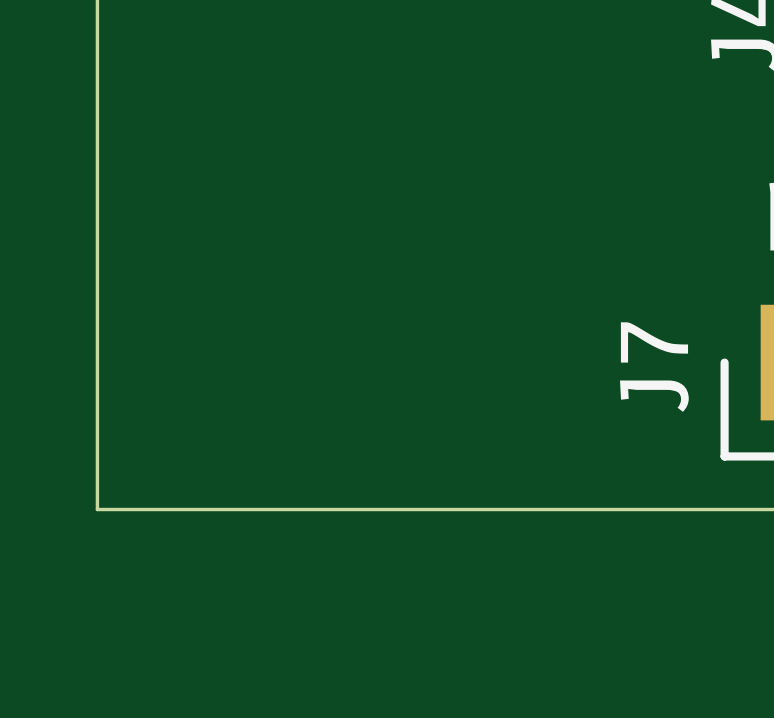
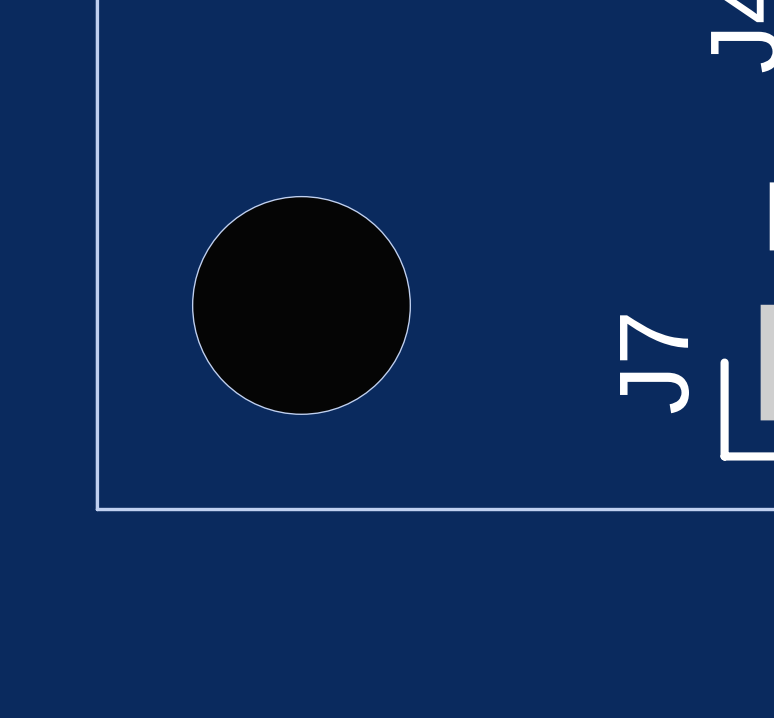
part: none -> (301, 305)

